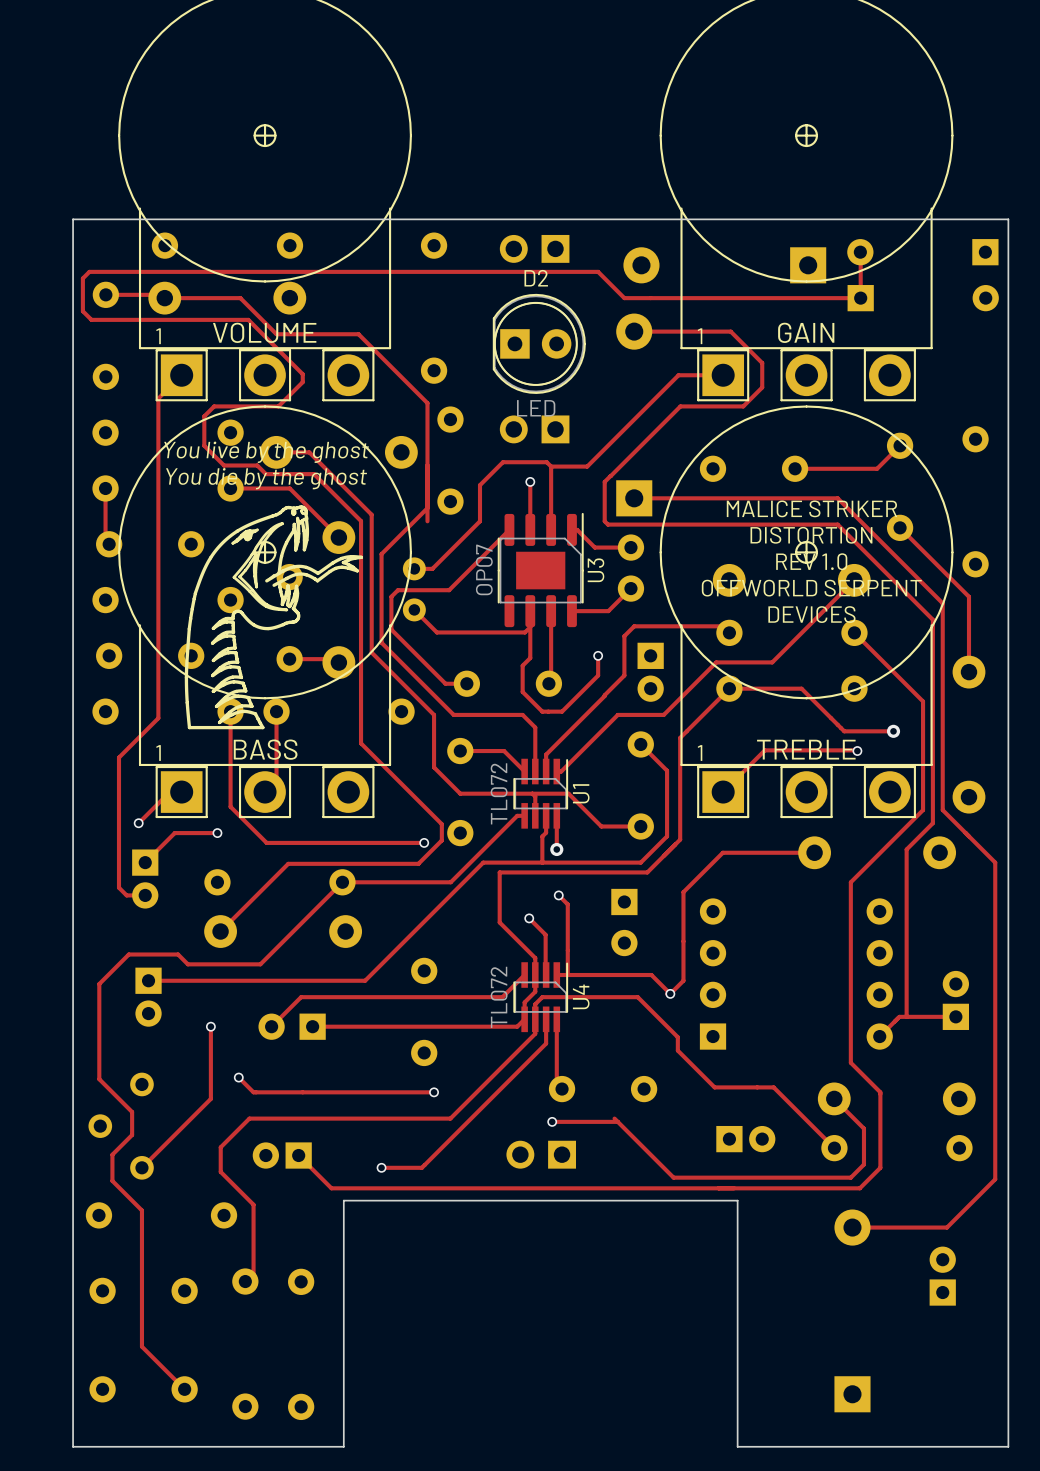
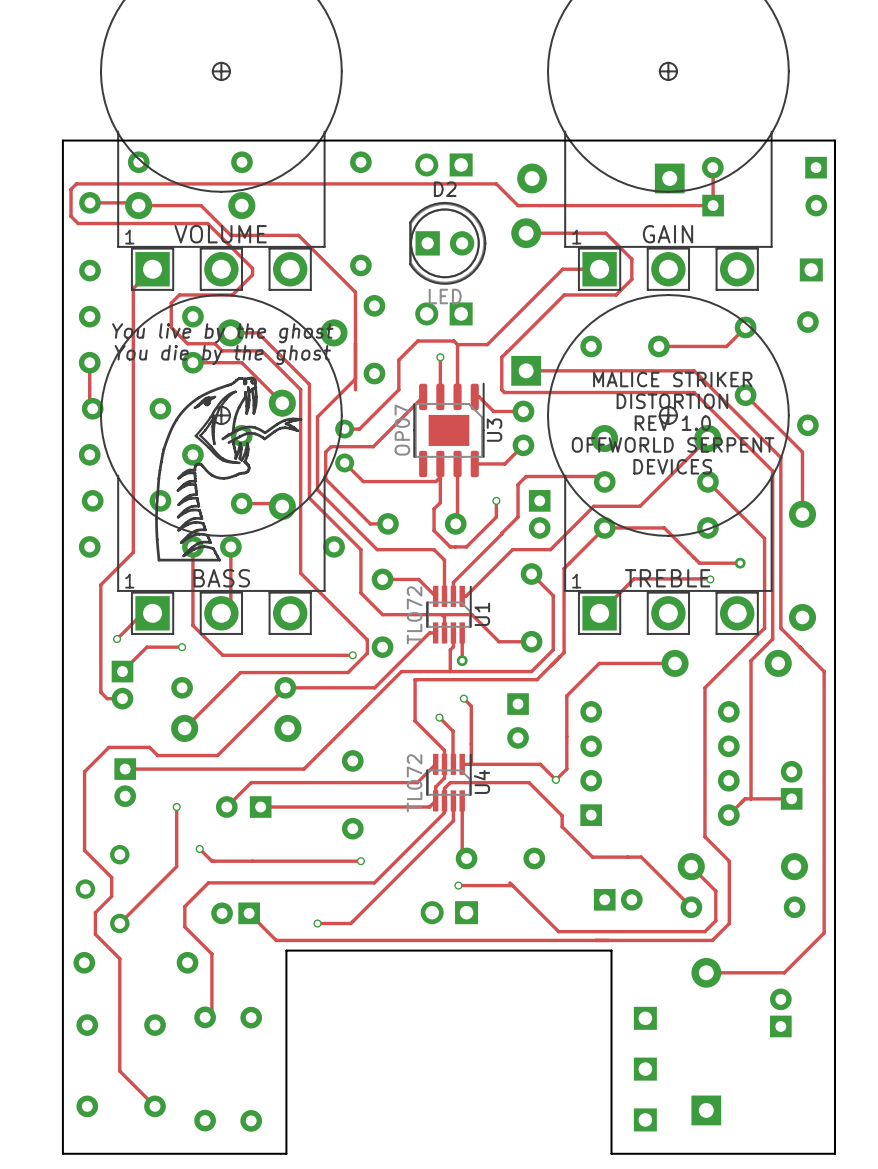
part: none -> (811, 269)
part: none -> (645, 1018)
part: none -> (645, 1069)
part: none -> (645, 1119)

